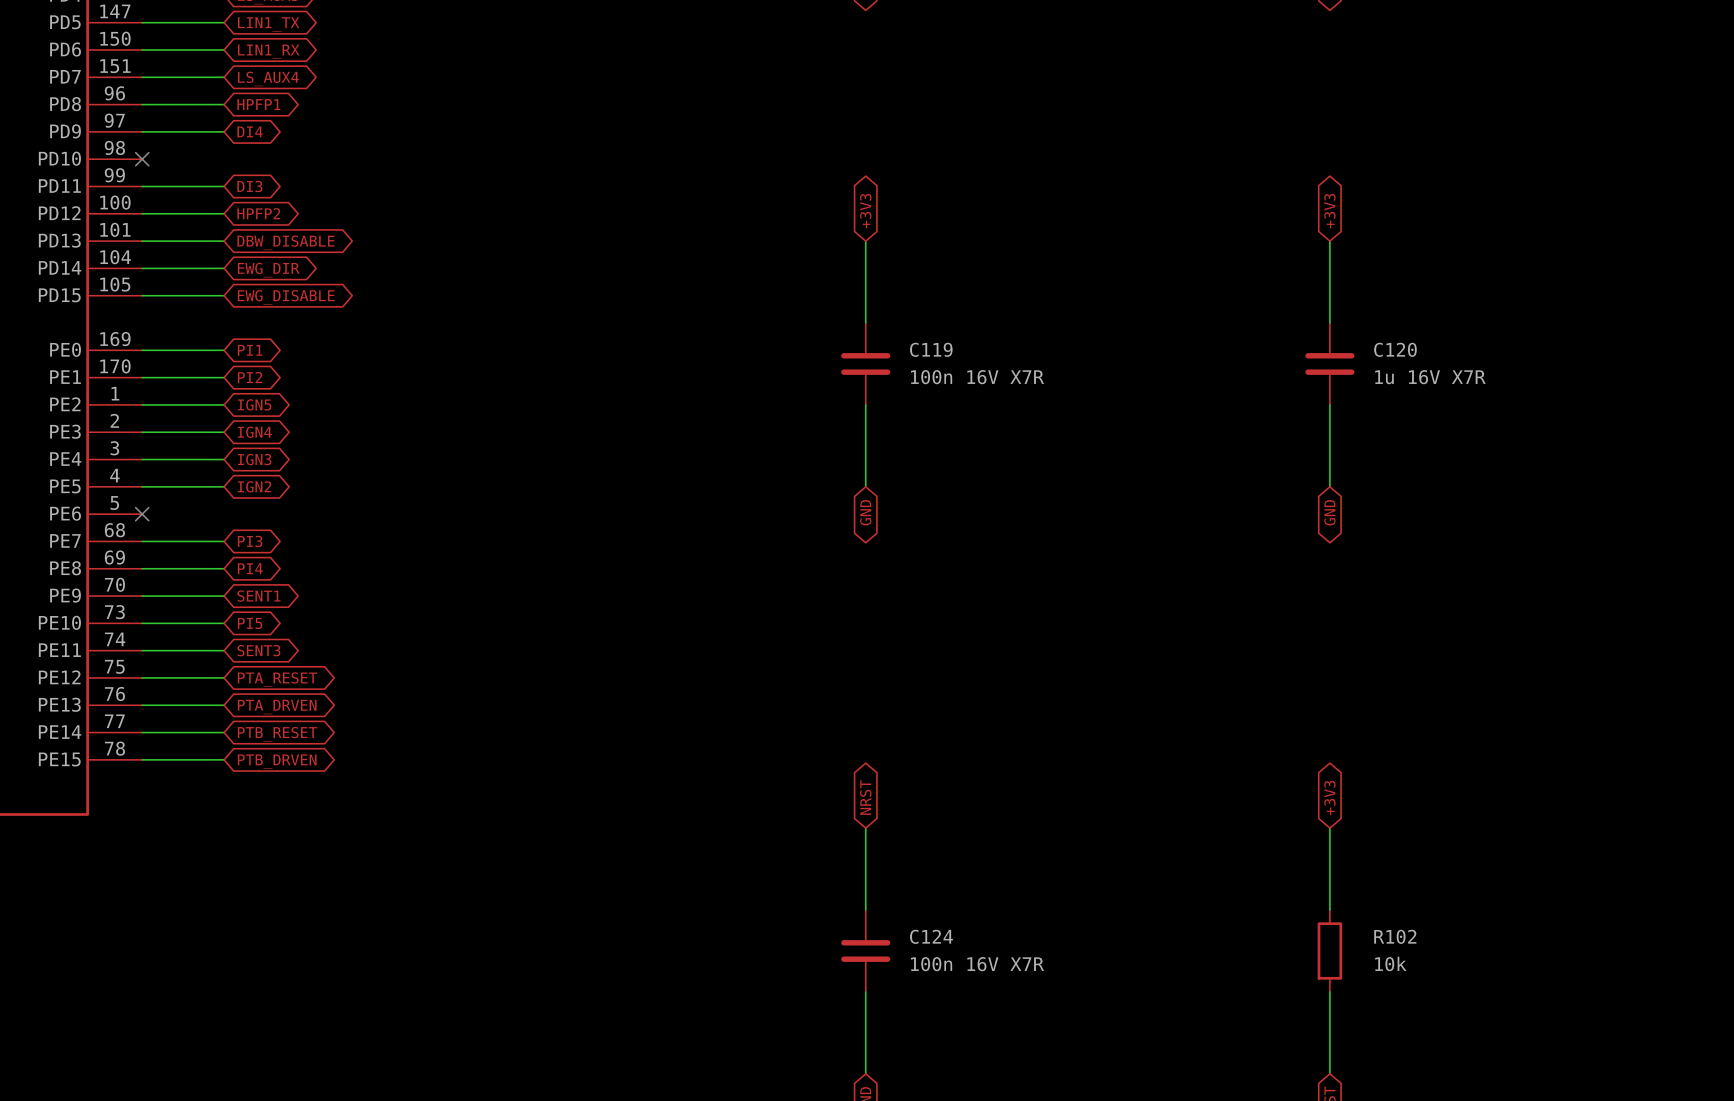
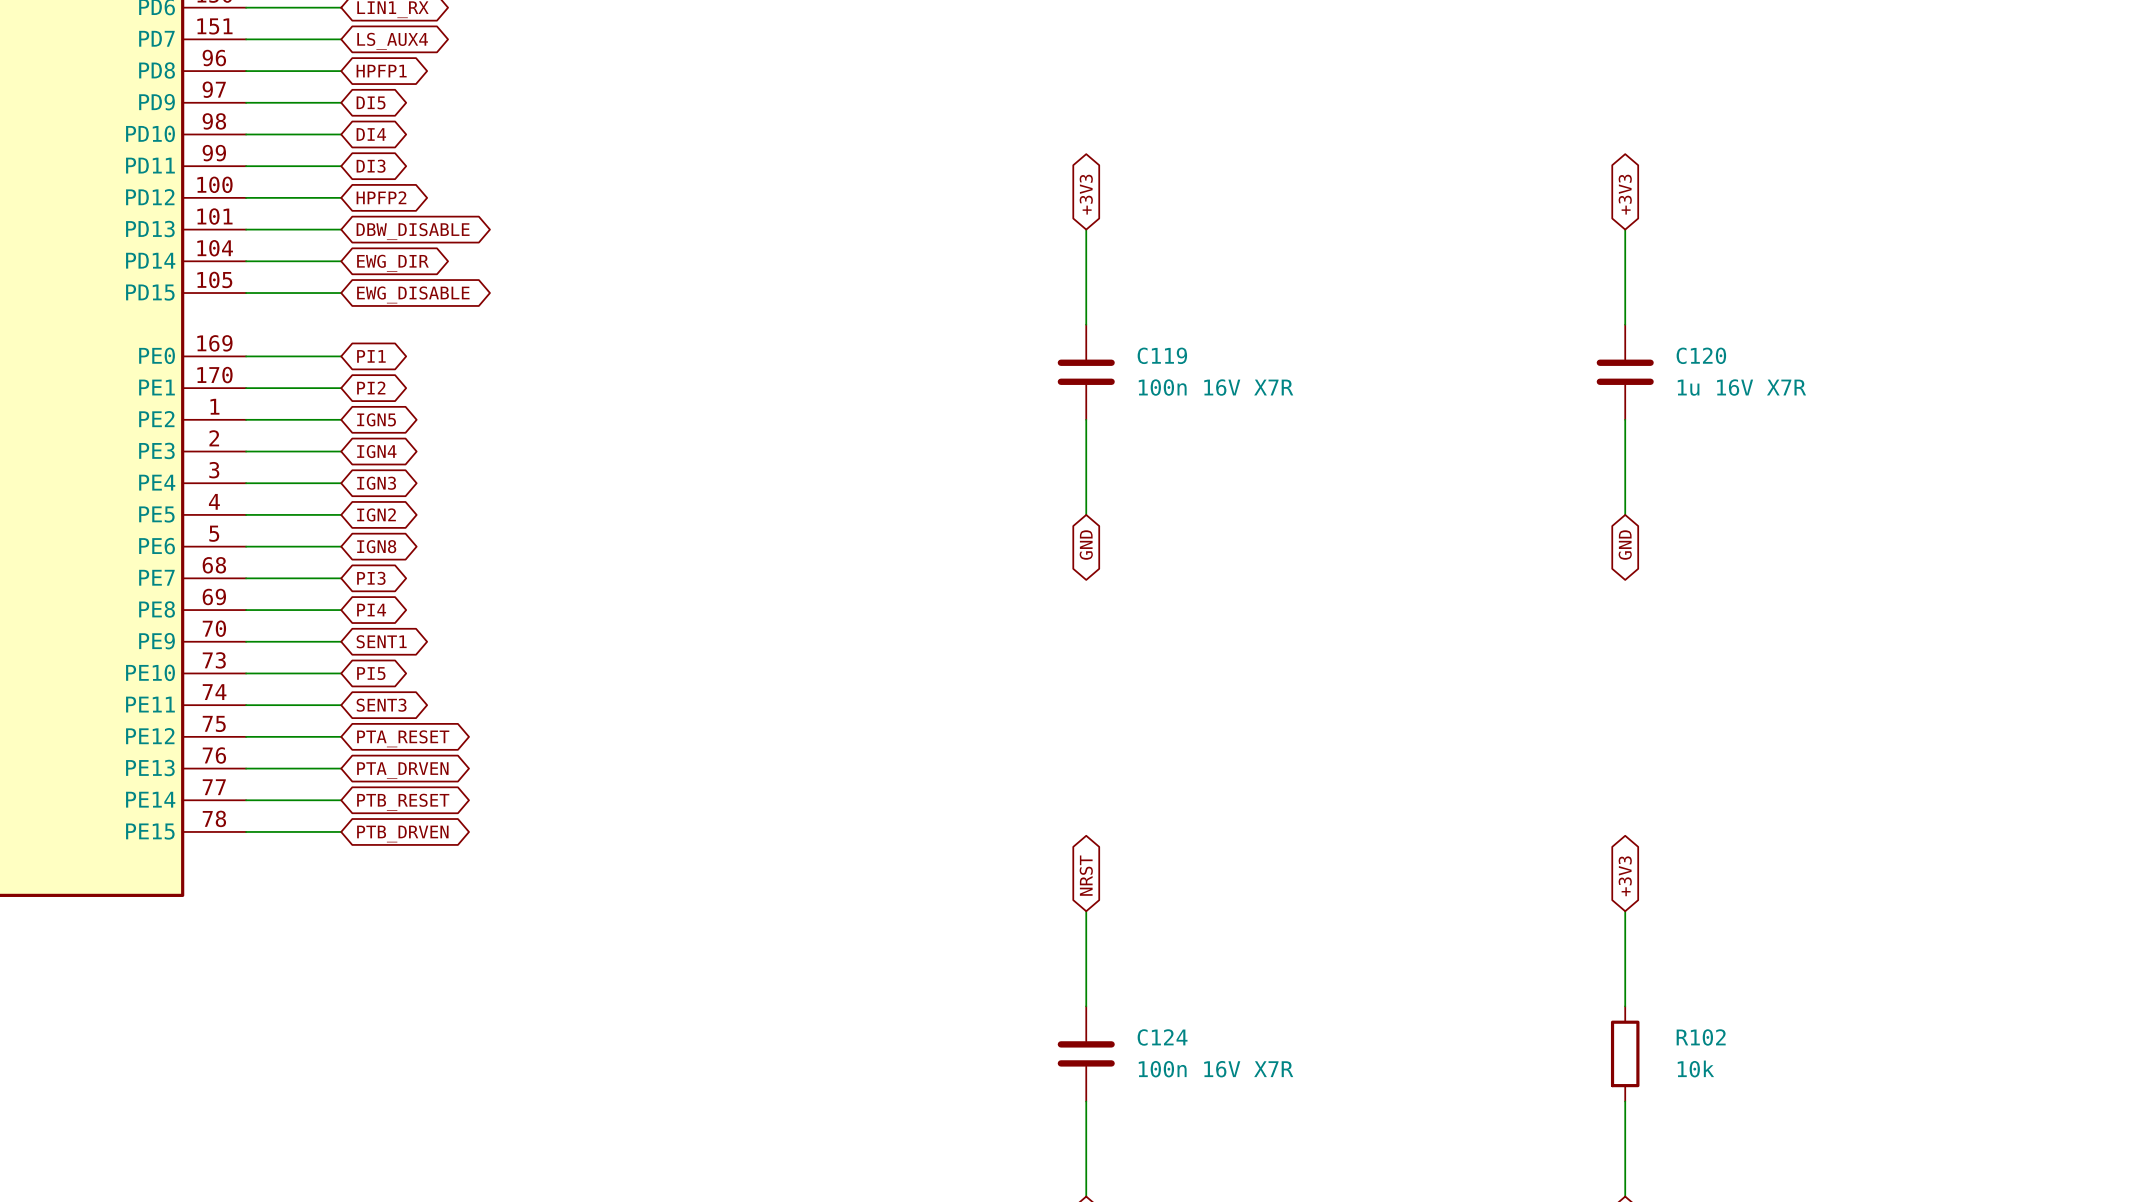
global label: DI4 (250, 131) -> DI5 (371, 102)
wire: none -> (246, 134) (341, 134)
no-connect mark: (142, 159) -> none
global label: none -> DI4 (371, 134)
wire: none -> (246, 546) (341, 546)
no-connect mark: (142, 514) -> none
global label: none -> IGN8 (376, 546)

